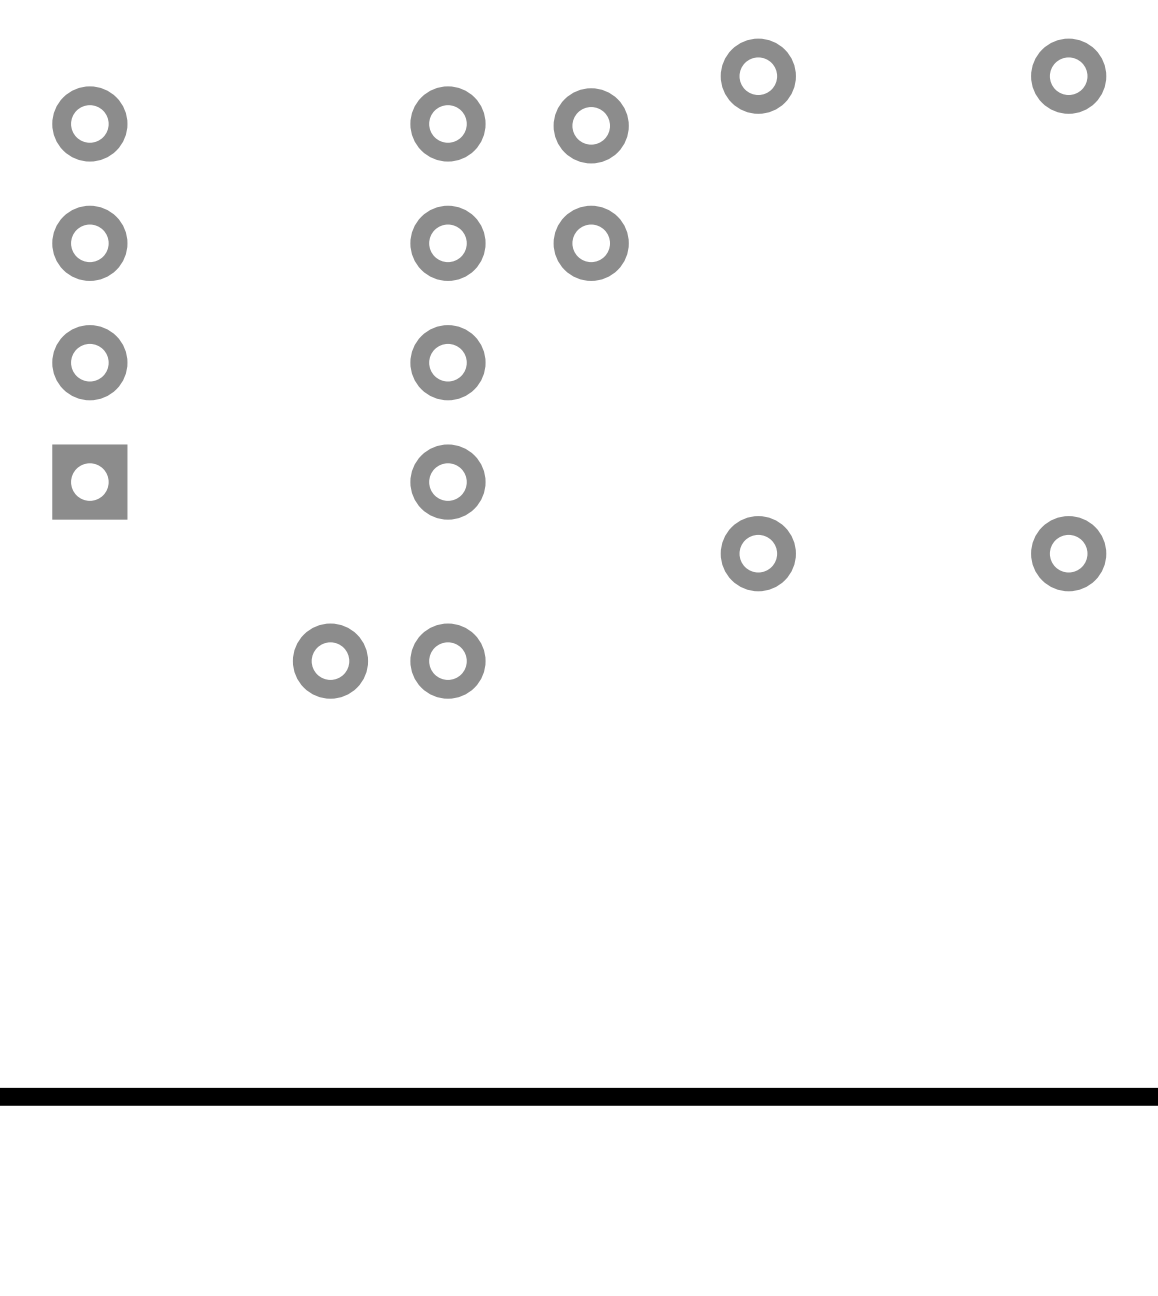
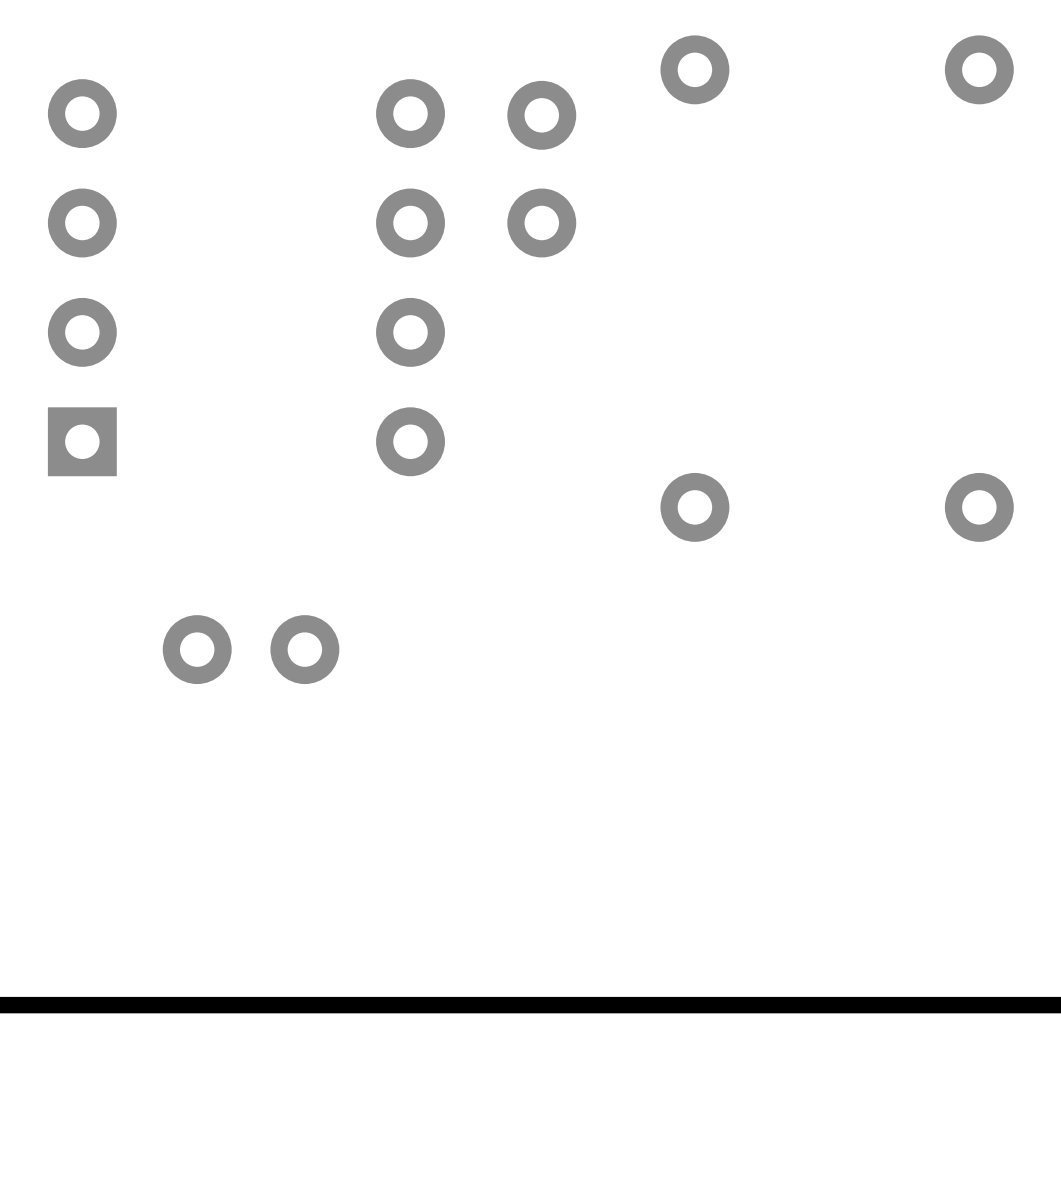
part position: (389, 661) -> (251, 649)

